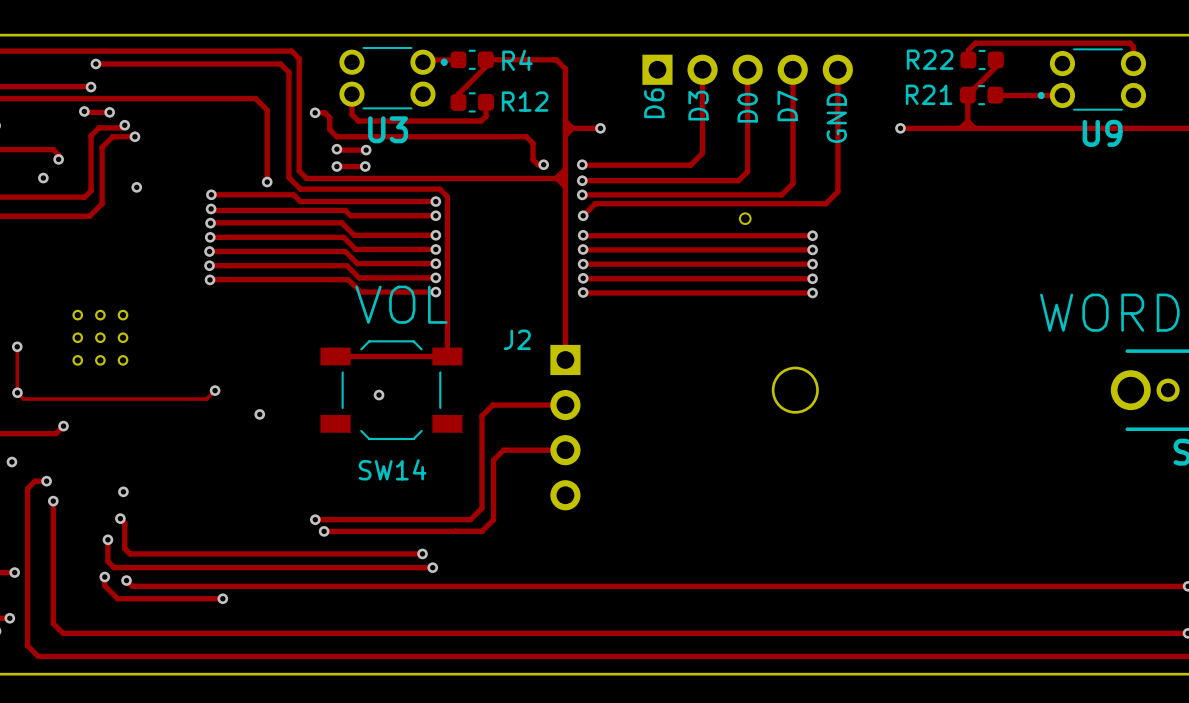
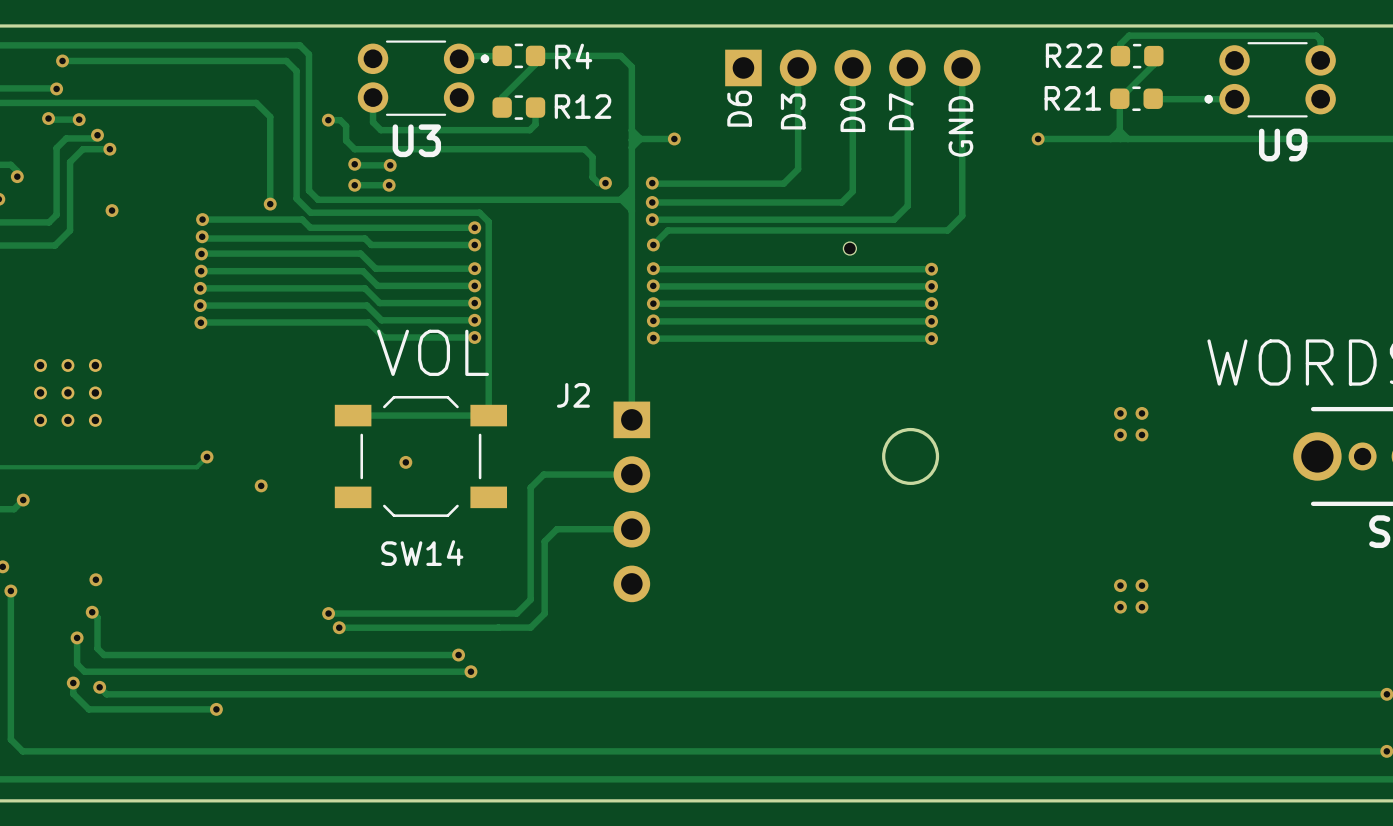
via: none -> (1120, 413)
via: none -> (1141, 413)
via: none -> (1120, 434)
via: none -> (1141, 434)
via: none -> (1120, 585)
via: none -> (1141, 585)
via: none -> (1120, 607)
via: none -> (1141, 607)

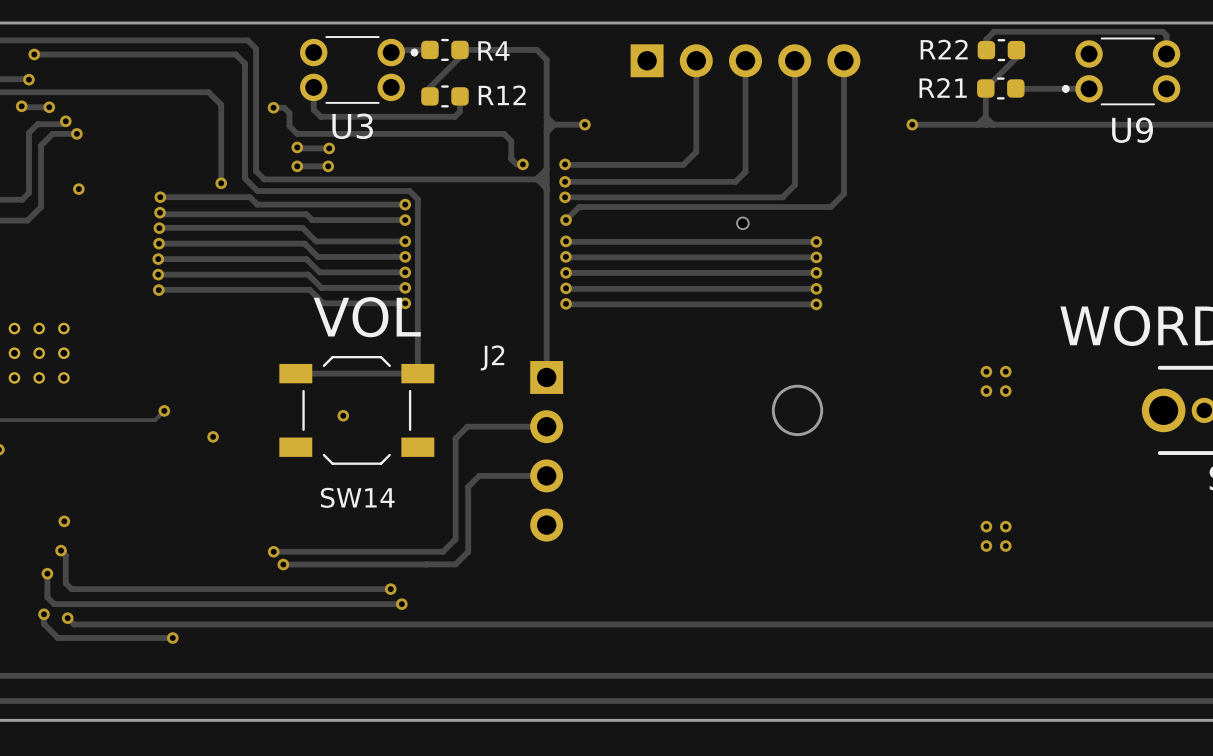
text: D6 (739, 108) -> none
text: D3 (793, 111) -> none
text: D7 (901, 111) -> none
text: D0 (852, 114) -> none
text: GND (960, 126) -> none

